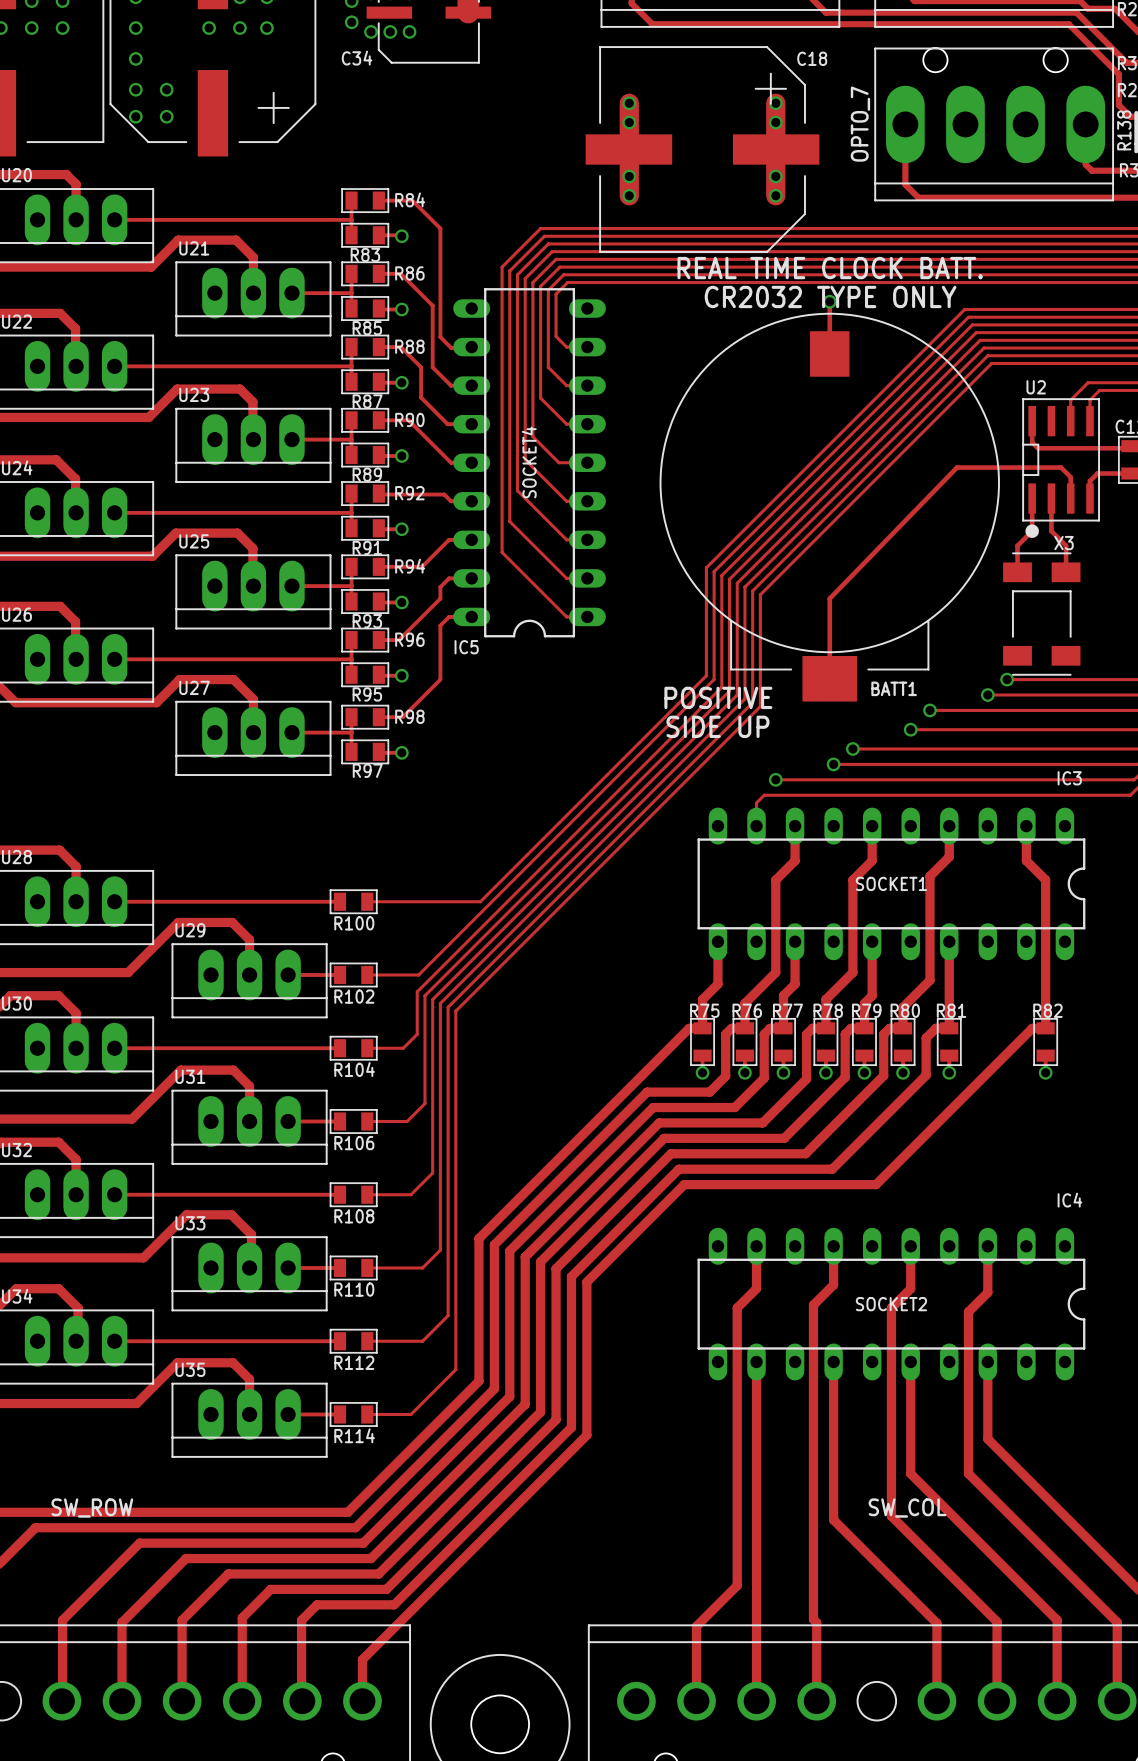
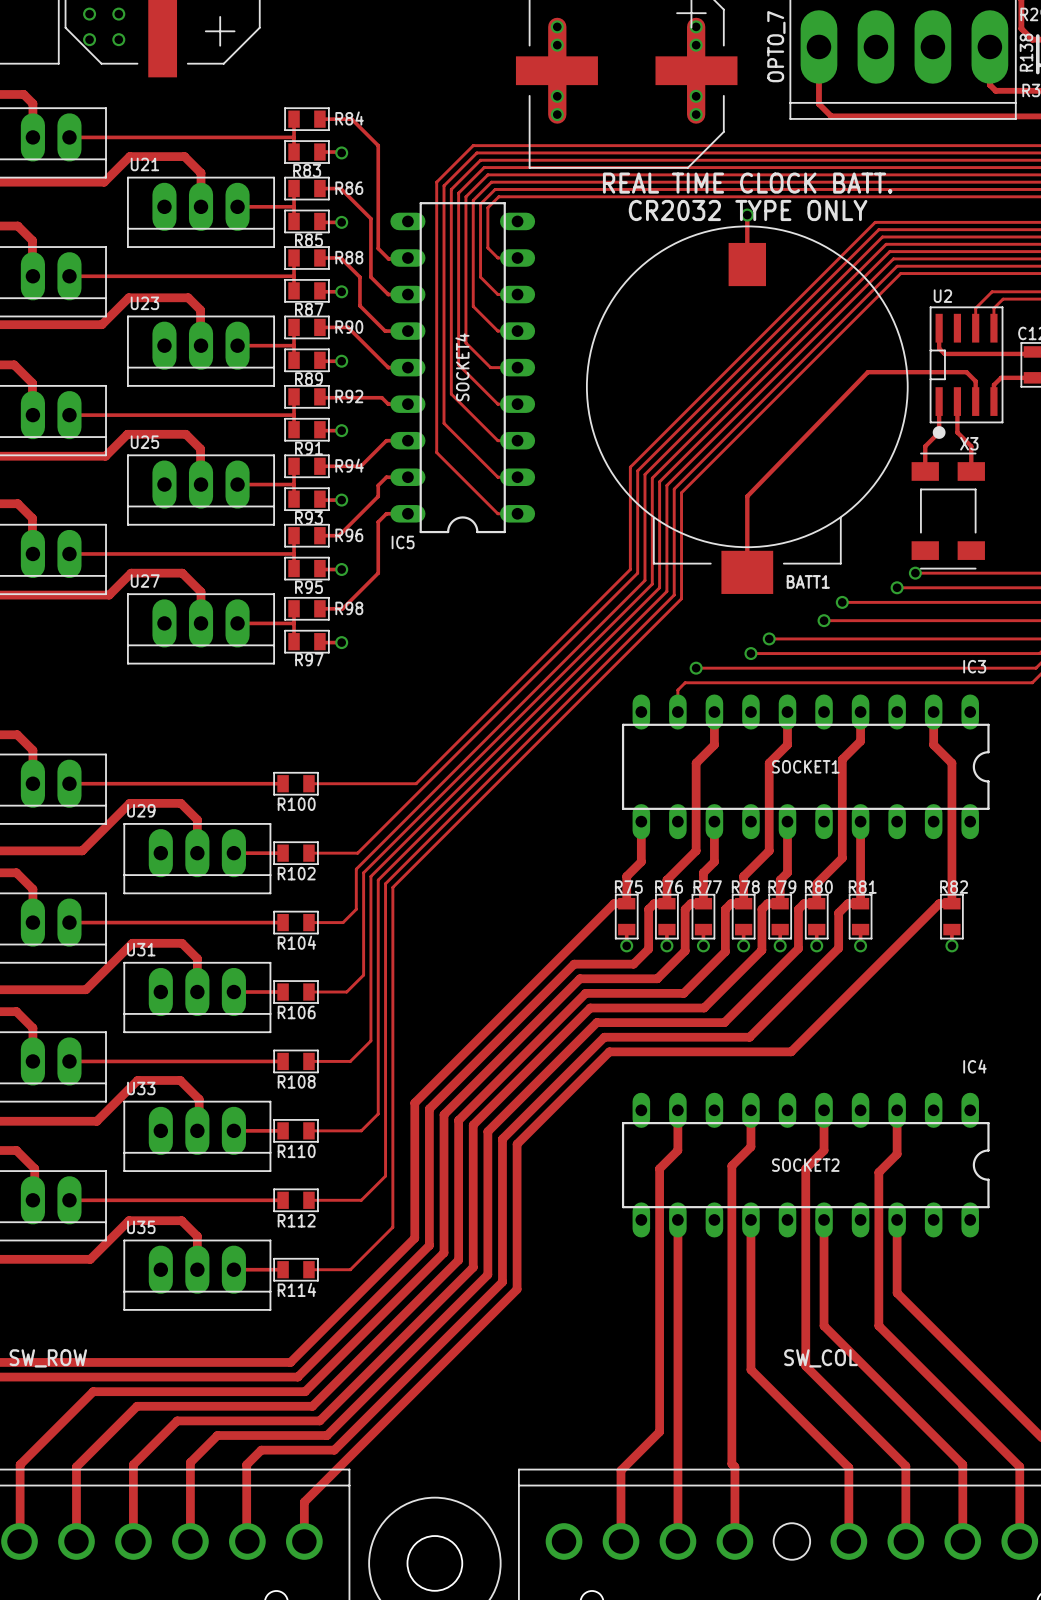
text: POSITIVE (718, 697) -> none
text: SIDE UP (717, 726) -> none

